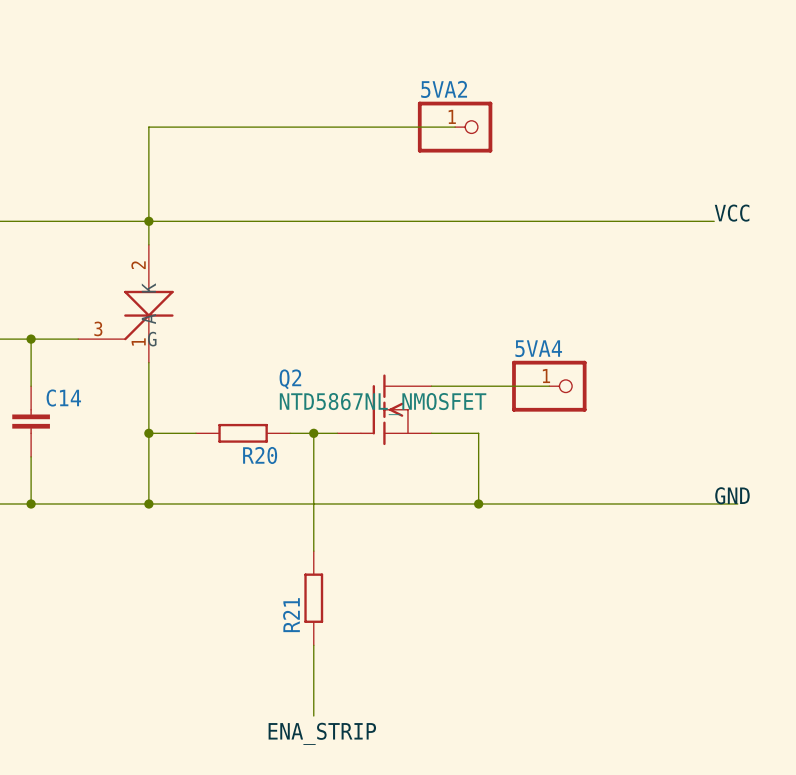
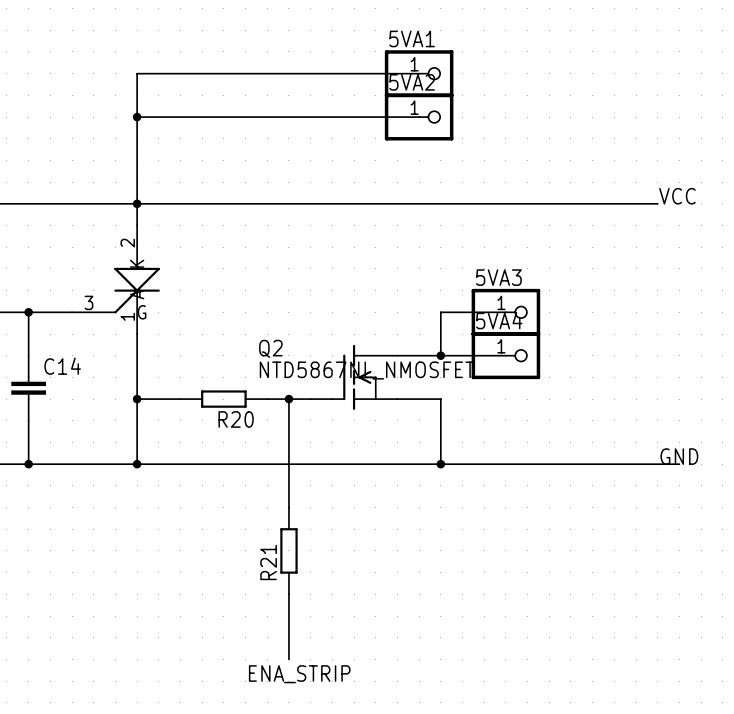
wire: none -> (419, 73) (137, 73) (137, 117)
5VA1: none -> (419, 73)
junction: none -> (137, 117)
wire: none -> (505, 312) (440, 312) (440, 355)
5VA3: none -> (505, 312)
junction: none -> (440, 355)

